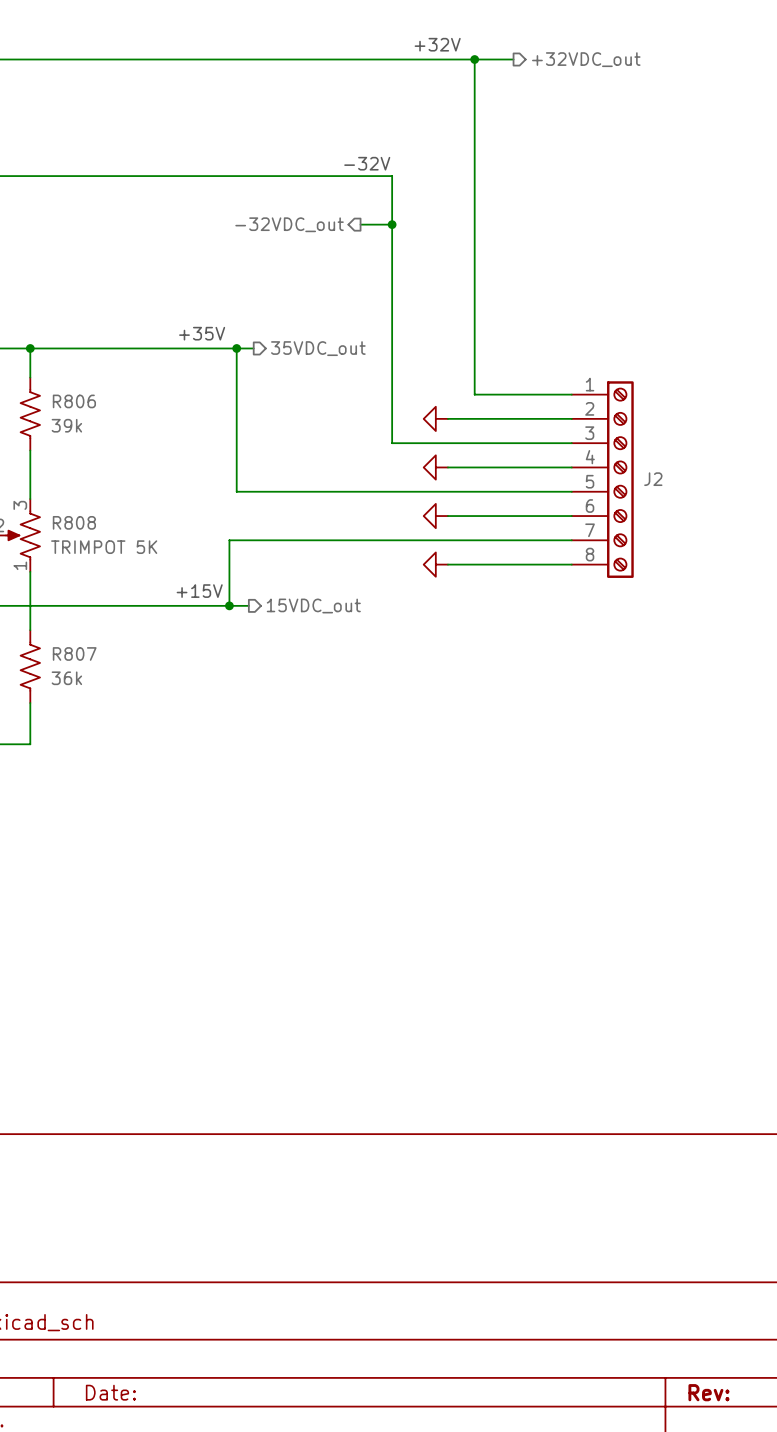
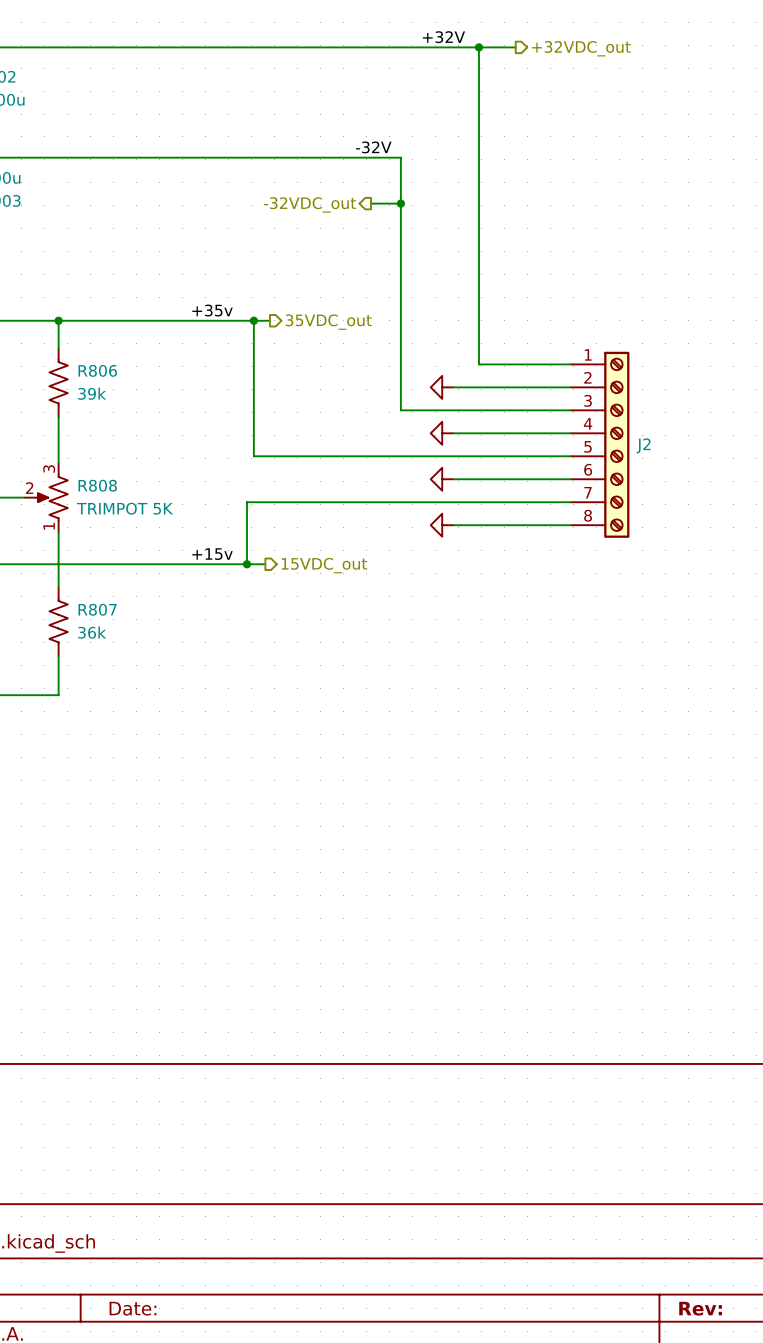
text: +32V (437, 44) -> none
label: none -> +32V (443, 37)
text: -32V (367, 163) -> none
label: none -> -32V (373, 147)
text: +35V (202, 333) -> none
label: none -> +35v (212, 310)
text: +15V (199, 591) -> none
label: none -> +15v (212, 554)

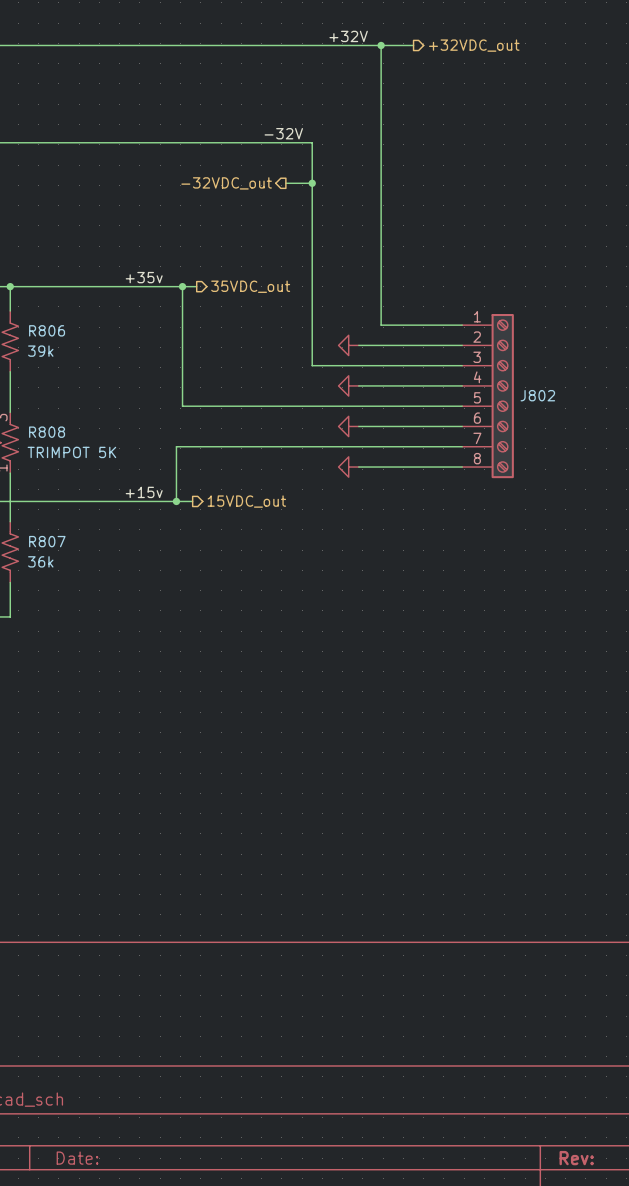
J2 name: J2 (643, 445) -> J802 (537, 395)

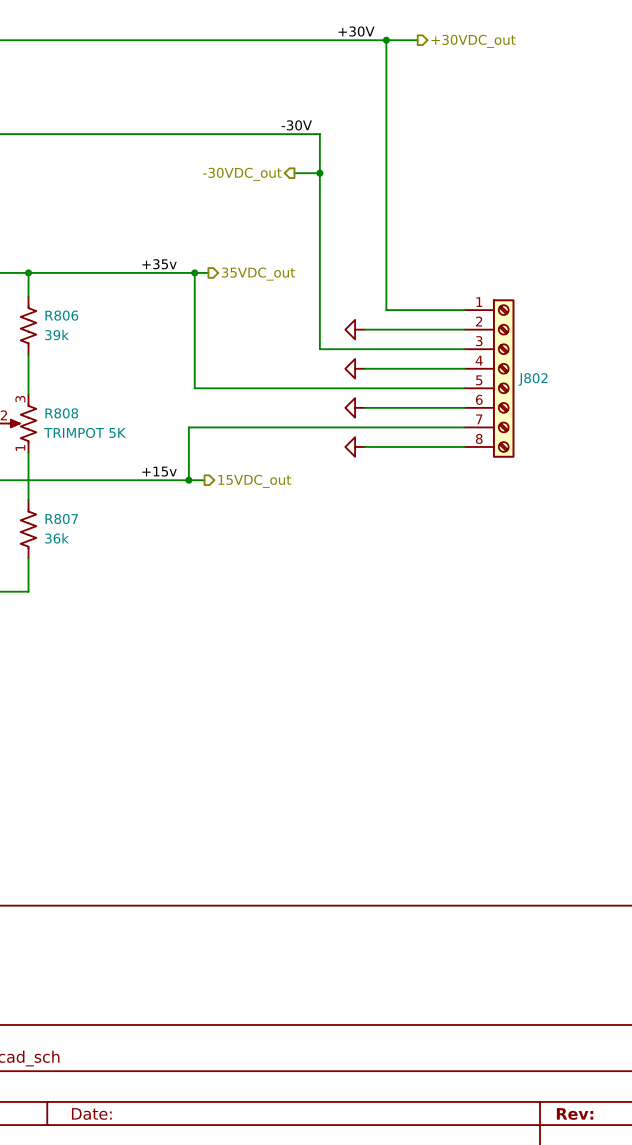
label: +32V (348, 36) -> +30V (356, 31)
hierarchical label: +32VDC_out (474, 45) -> +30VDC_out (473, 41)
label: -32V (283, 133) -> -30V (296, 125)
hierarchical label: -32VDC_out (226, 183) -> -30VDC_out (242, 174)

